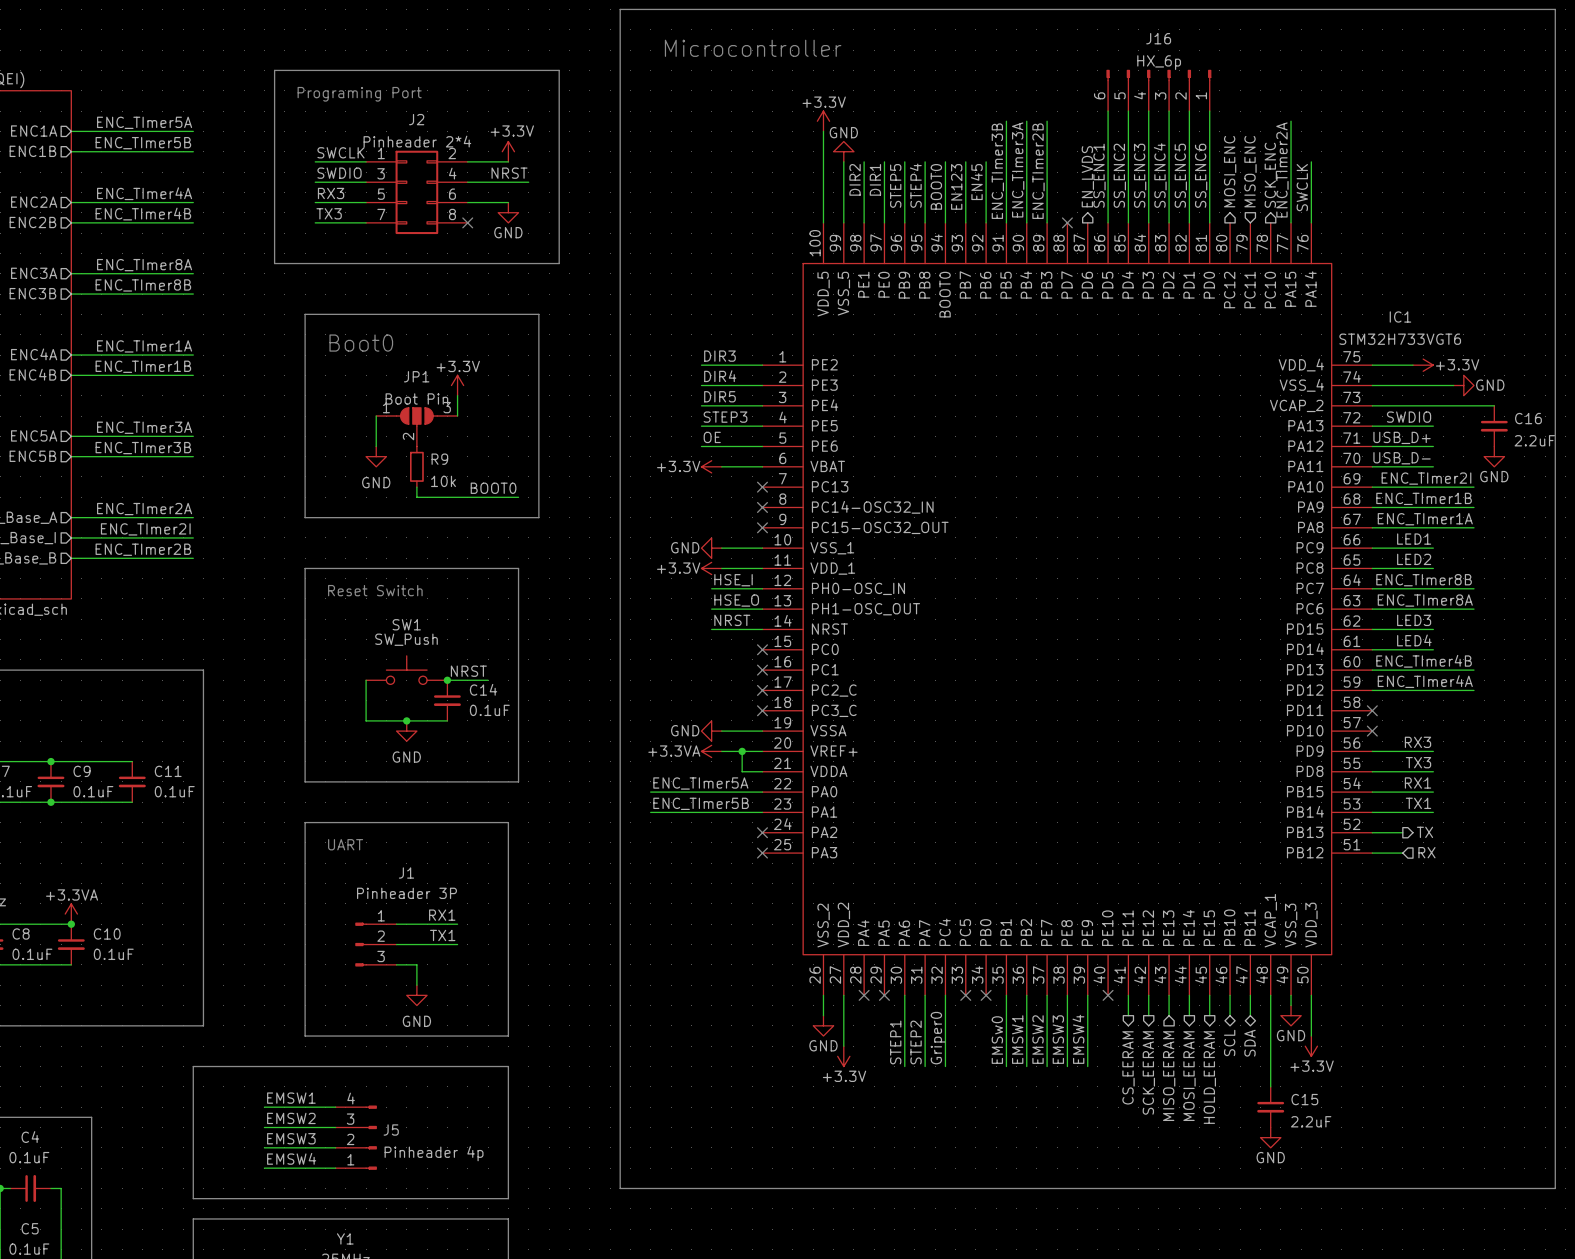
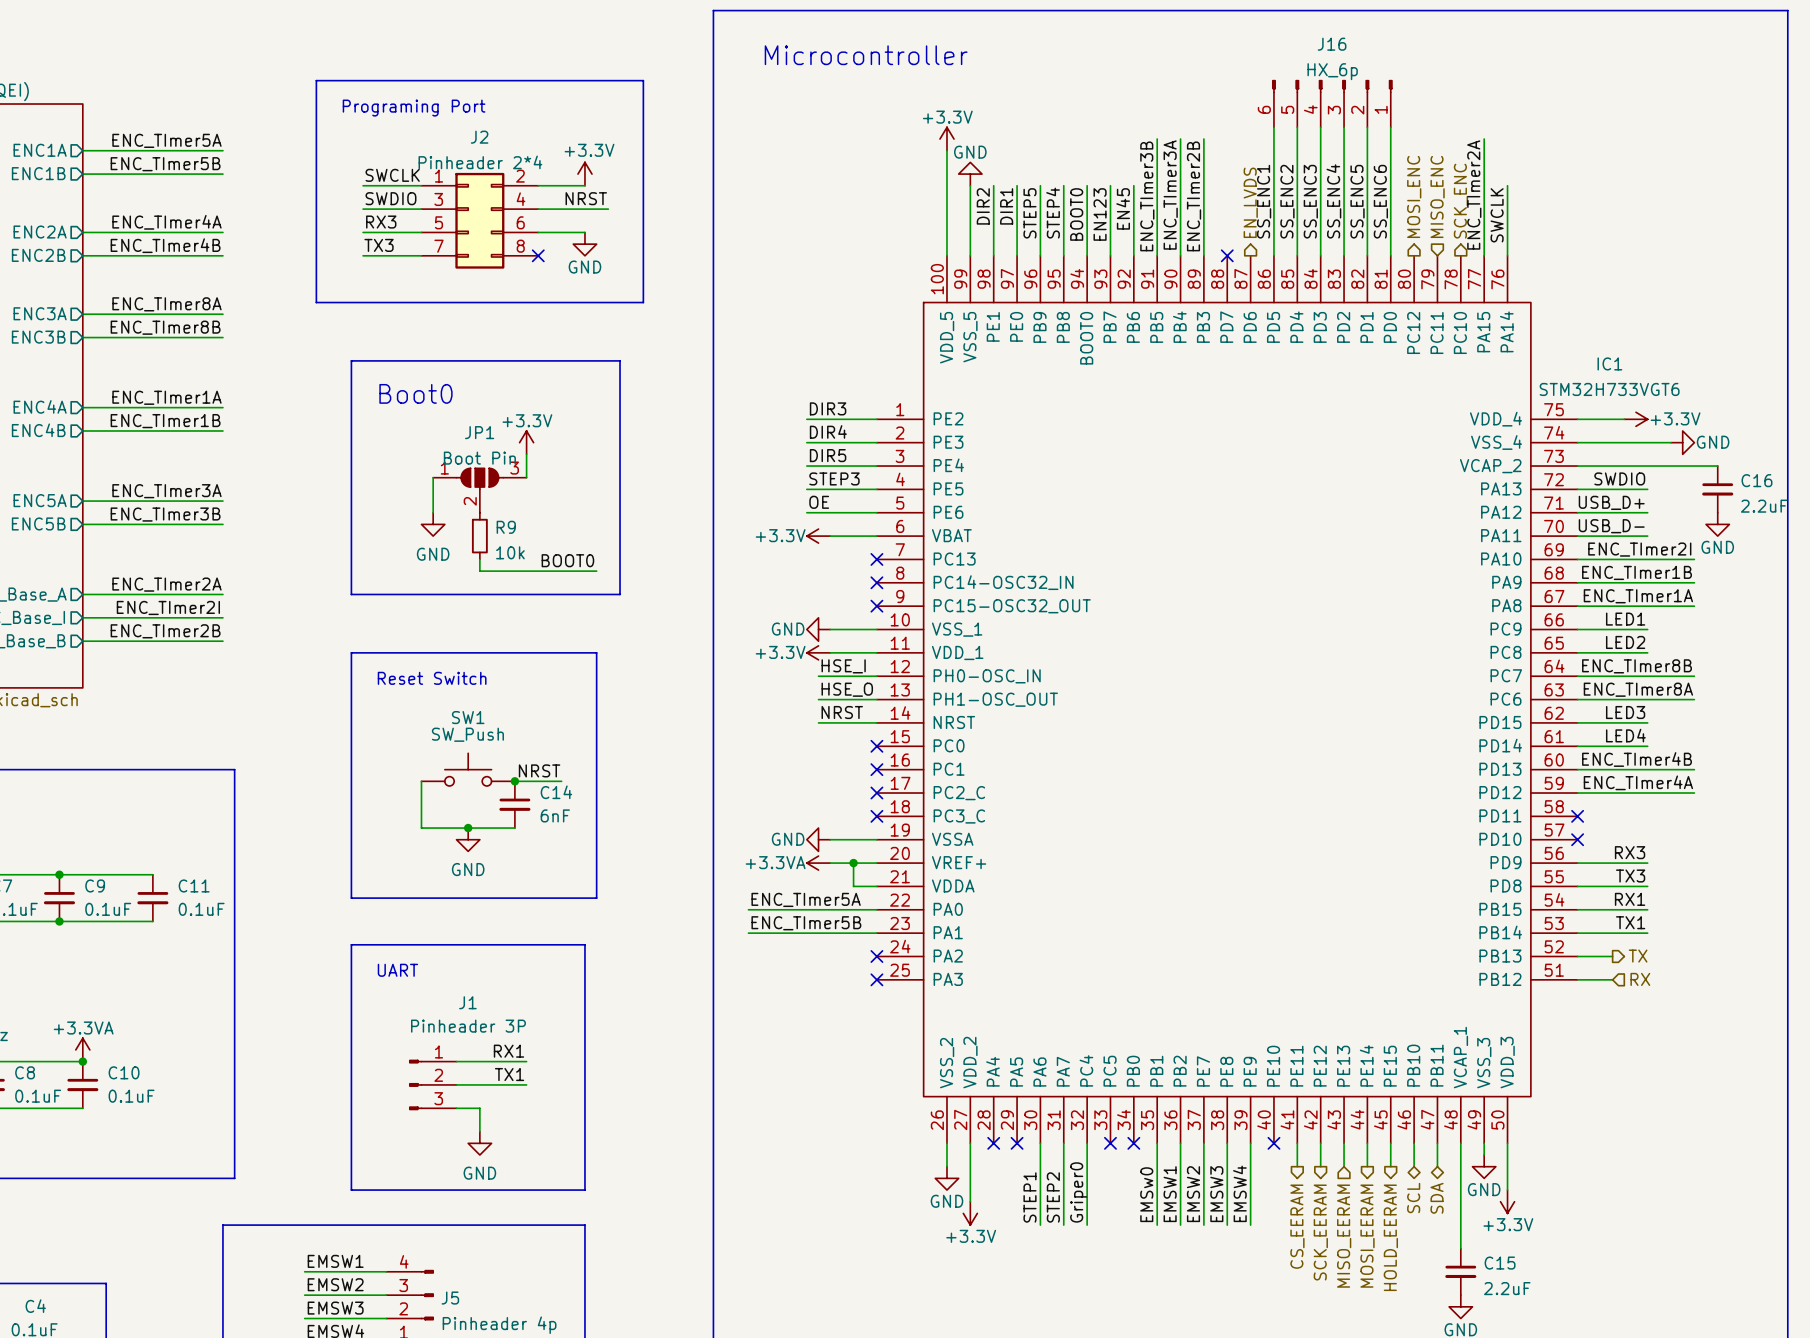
C14 value: 0.1uF (489, 710) -> 6nF (555, 815)

